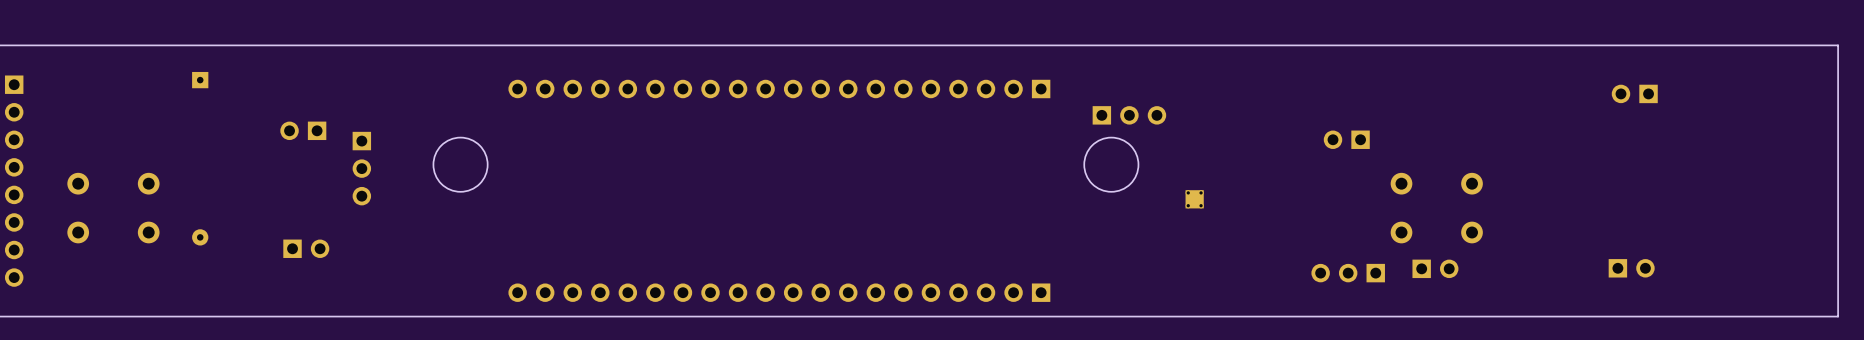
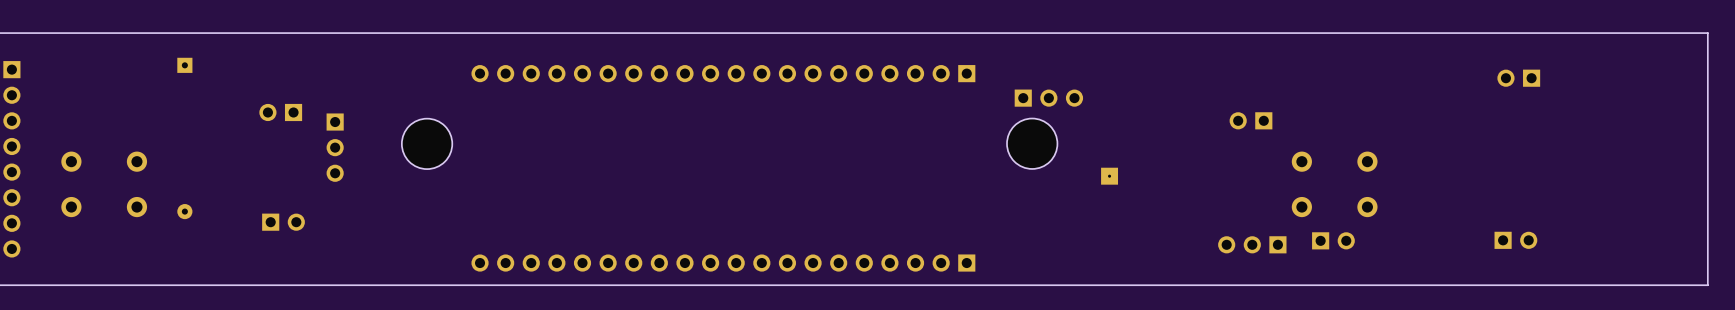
round board edge: [432, 137, 489, 193] -> none
round board edge: [1083, 137, 1140, 193] -> none
part: none -> (427, 143)
part: none -> (1032, 143)
part footprint: [1185, 190, 1204, 209] -> [1101, 167, 1119, 185]

